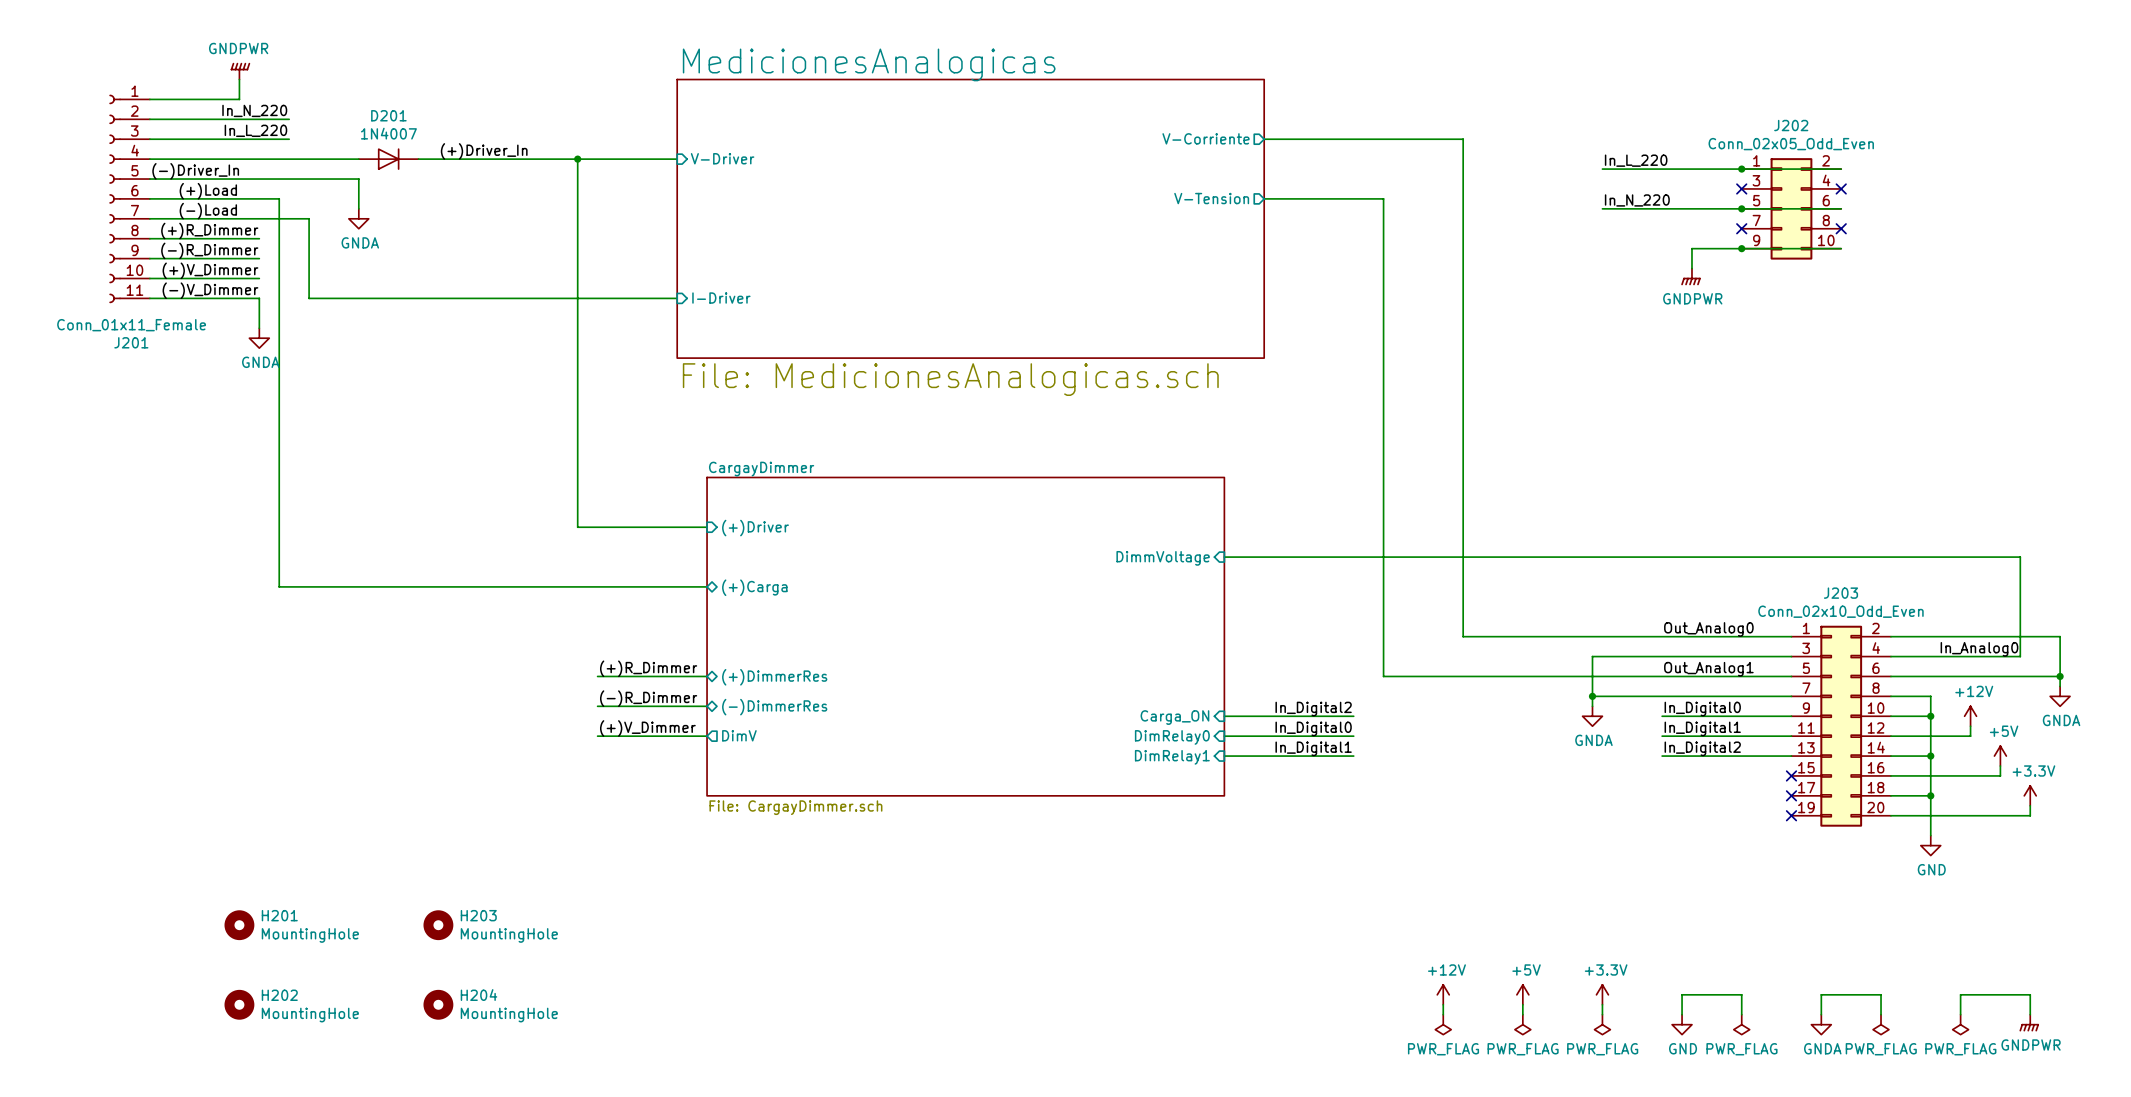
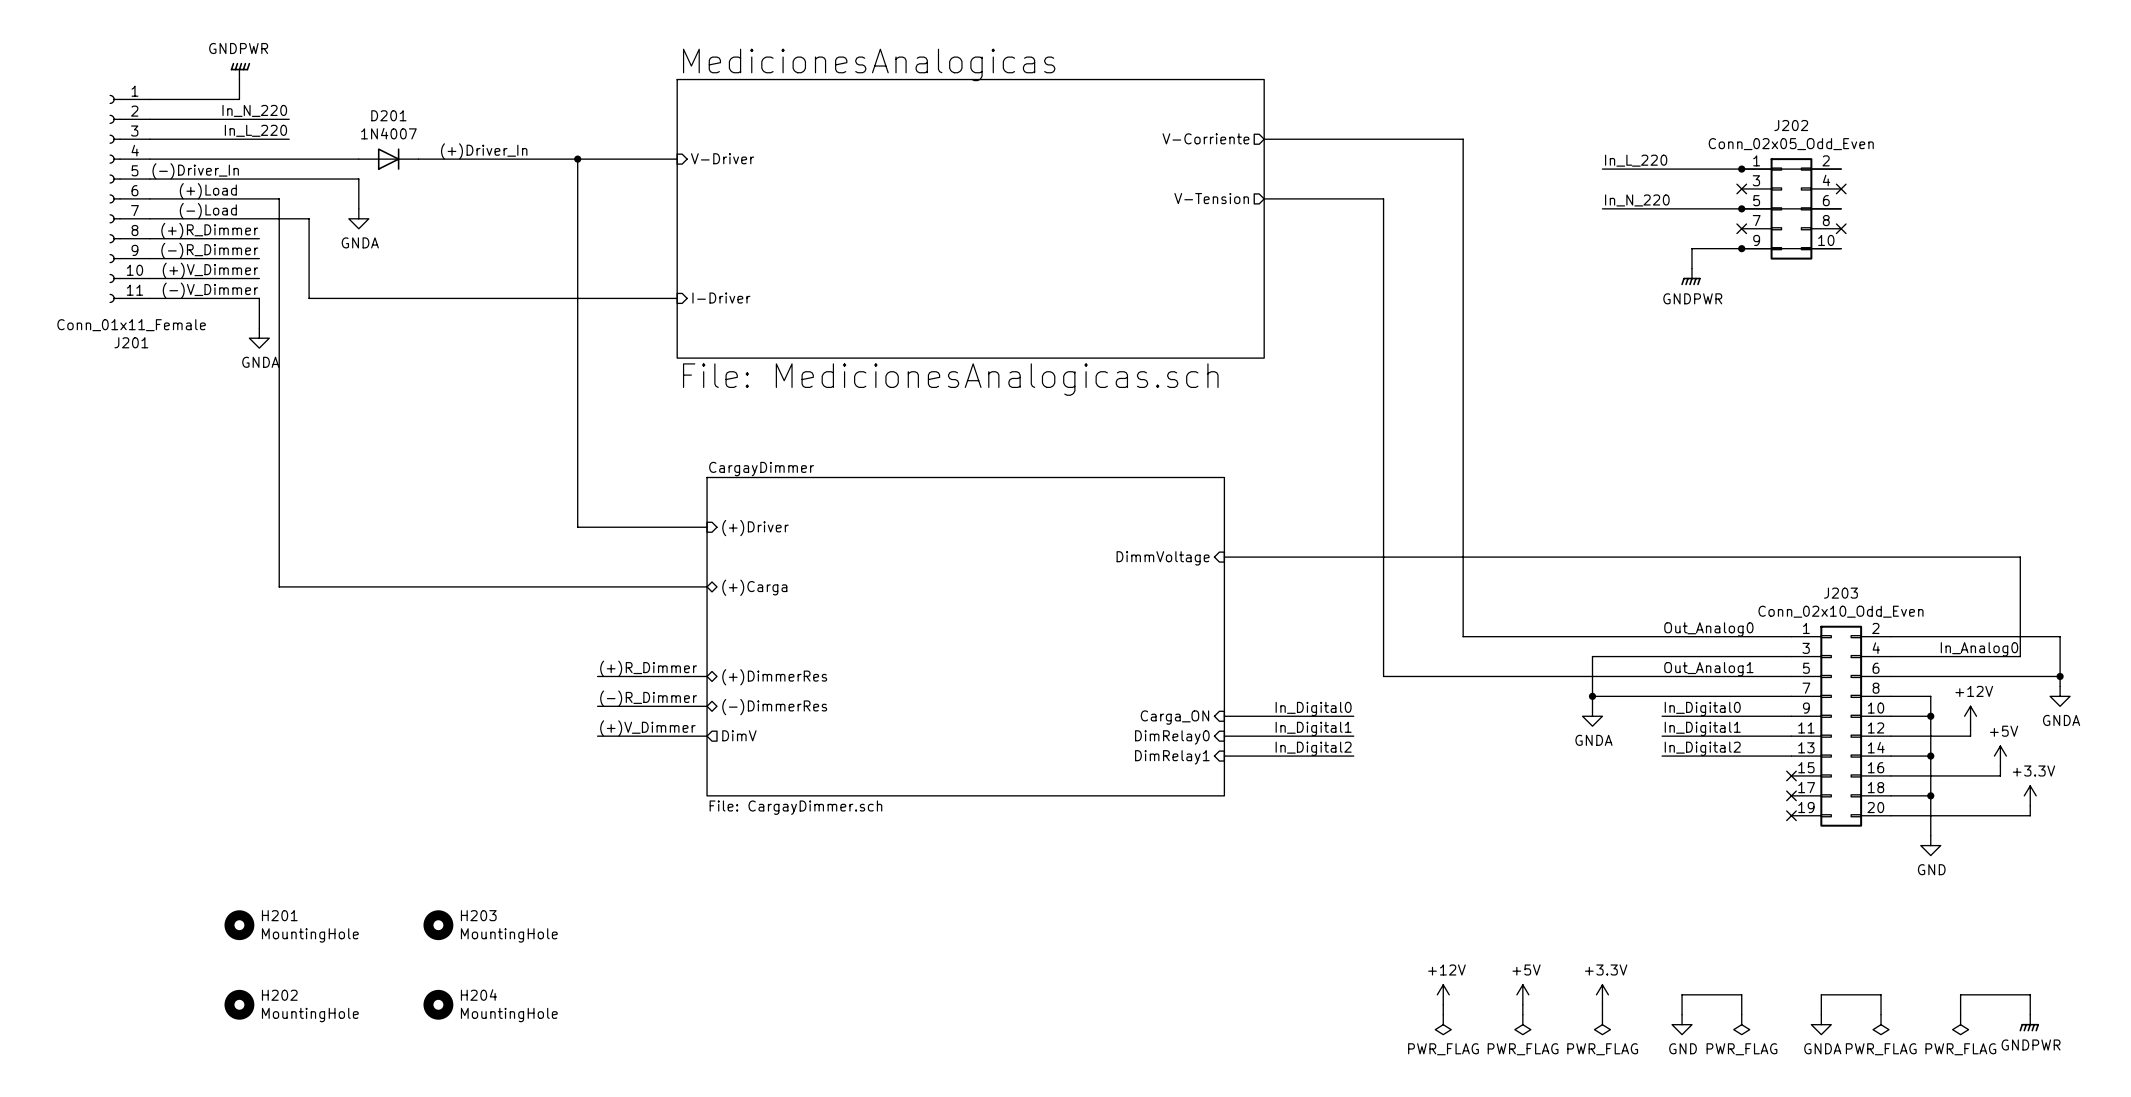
label: In_Digital2 (1313, 709) -> In_Digital0 (1313, 709)
label: In_Digital0 (1313, 728) -> In_Digital1 (1313, 728)
label: In_Digital1 (1313, 748) -> In_Digital2 (1313, 748)

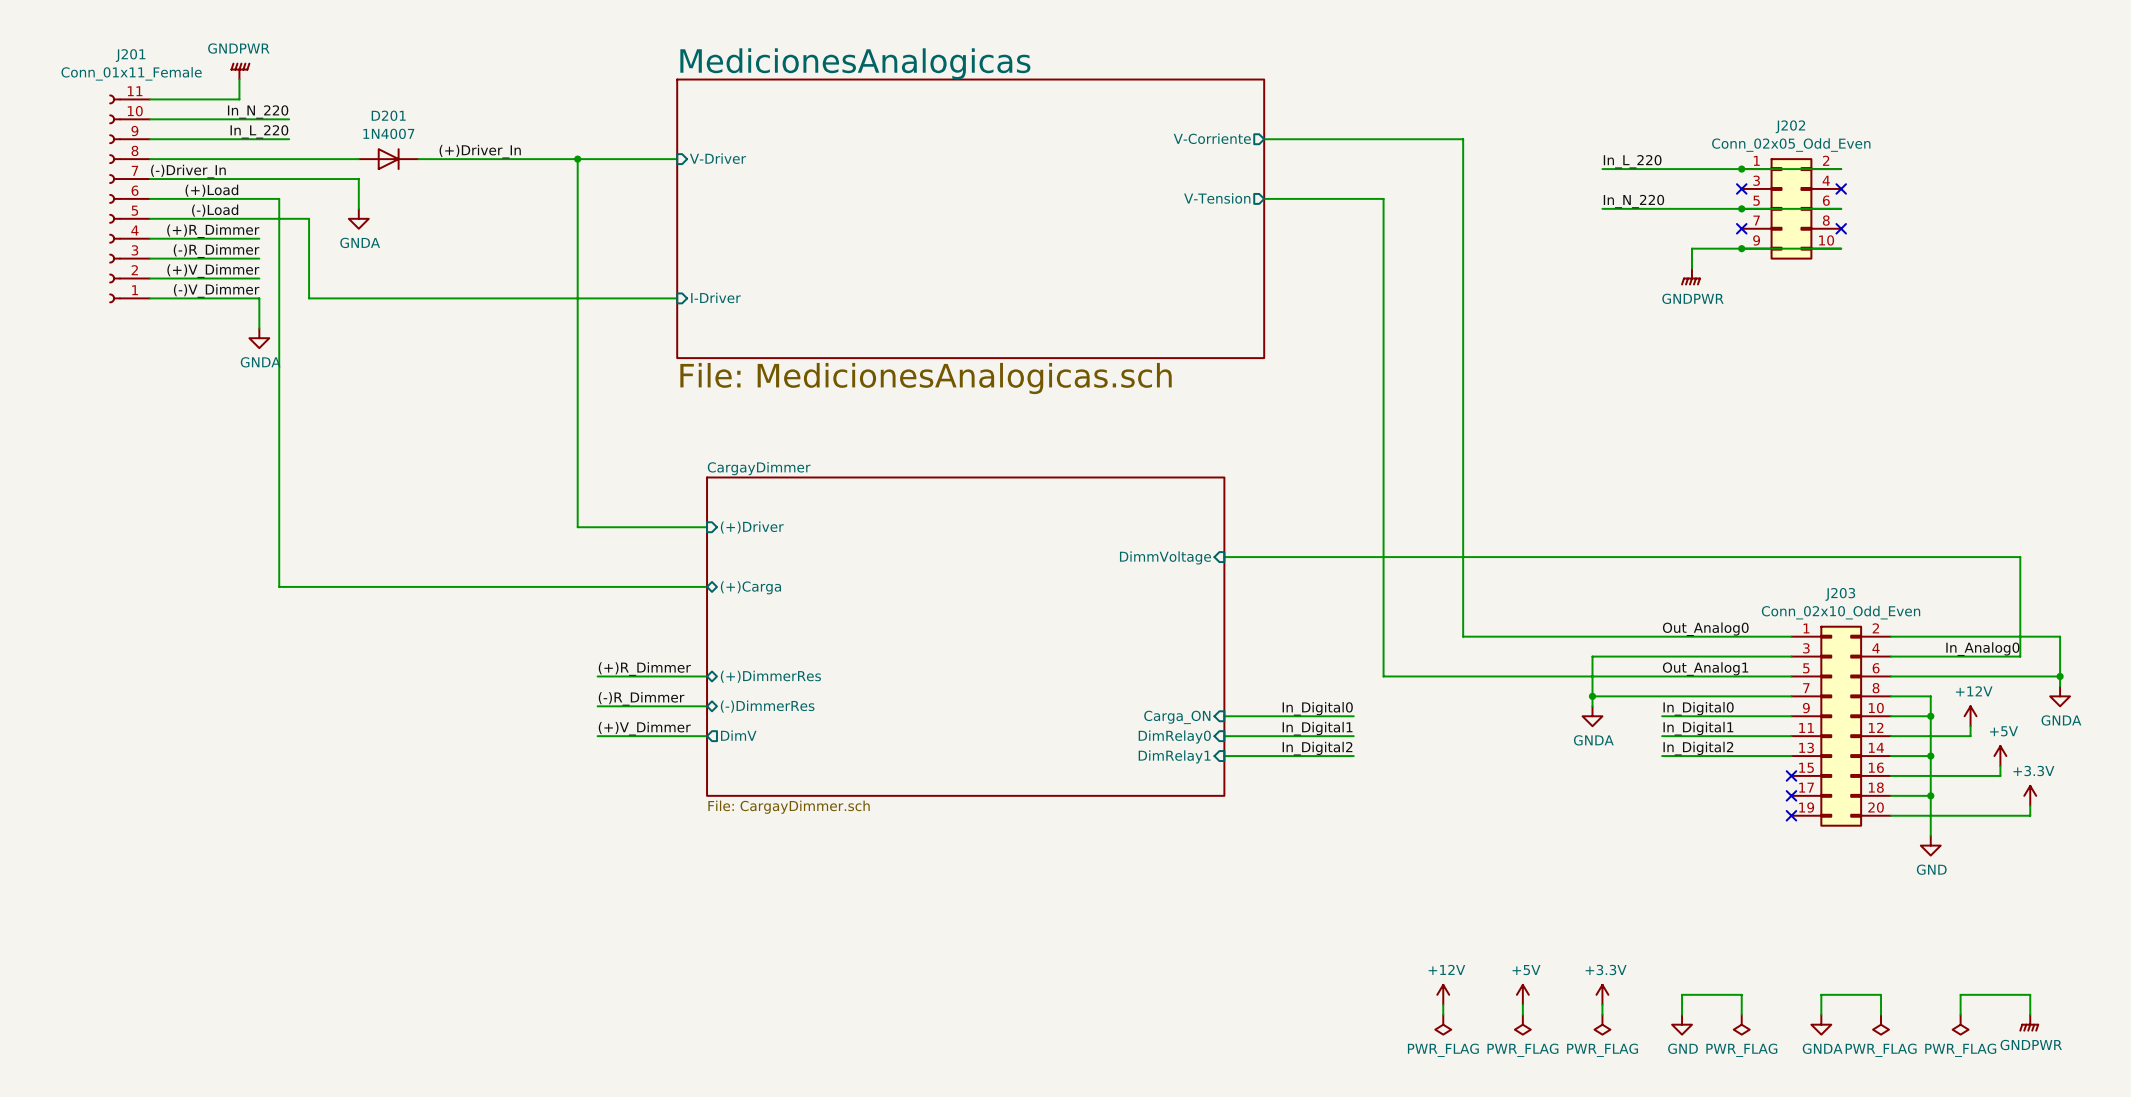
J201 flip: as is (115, 198) -> up-down (115, 198)
H201: MountingHole (239, 925) -> none
H203: MountingHole (438, 925) -> none
H202: MountingHole (239, 1004) -> none
H204: MountingHole (438, 1004) -> none

